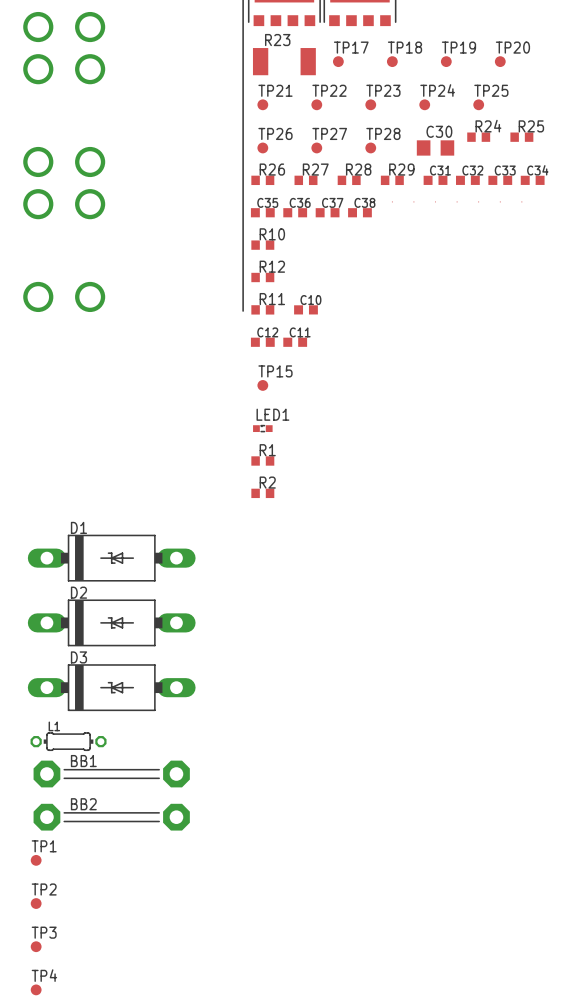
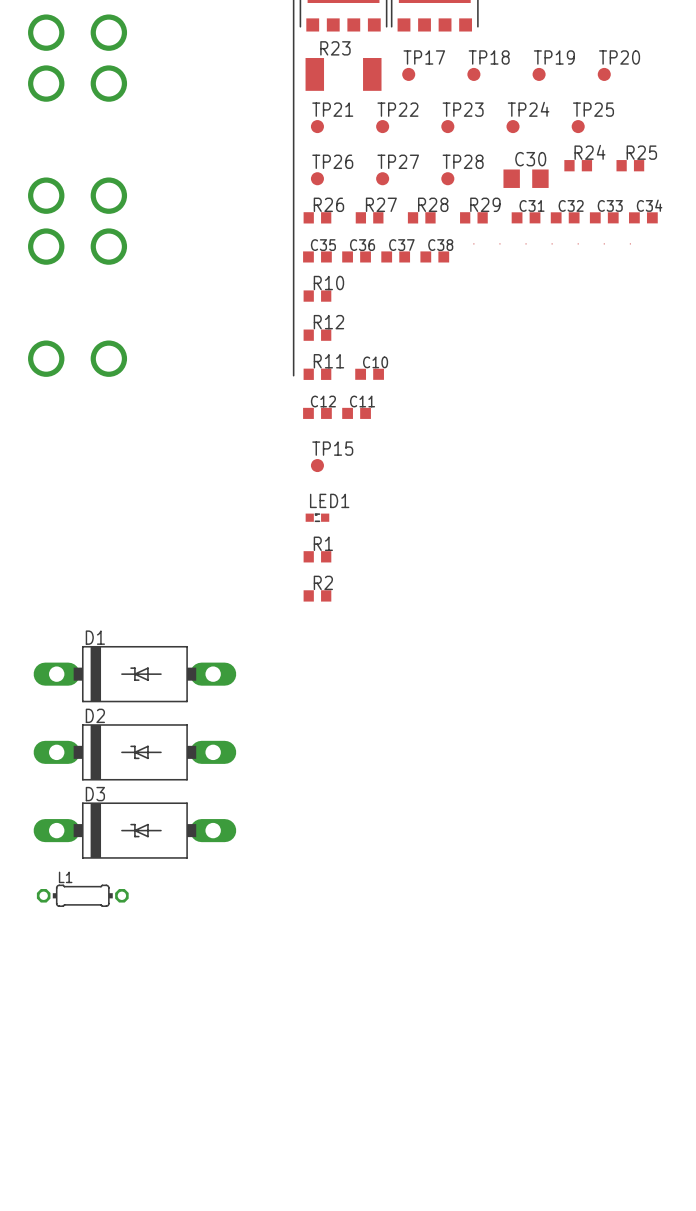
BB1: (111, 774) -> none
BB2: (111, 817) -> none
TP1: (36, 860) -> none
TP2: (36, 903) -> none
TP3: (36, 946) -> none
TP4: (36, 989) -> none

